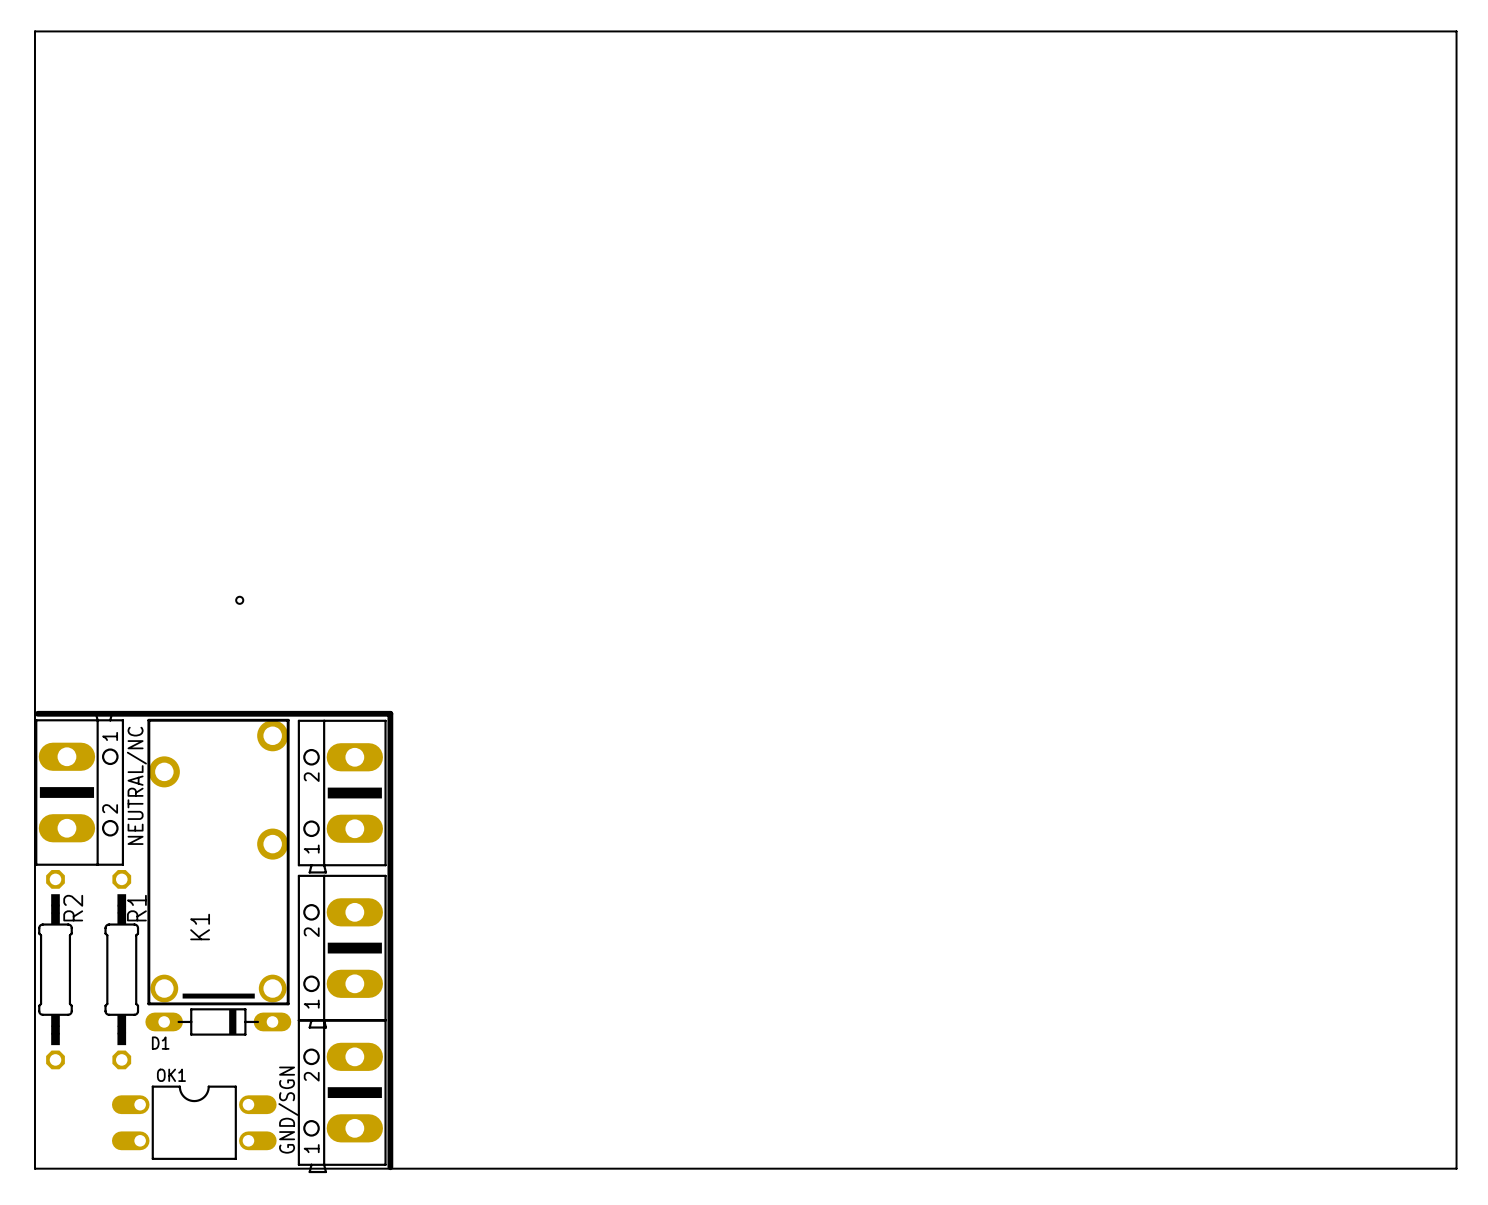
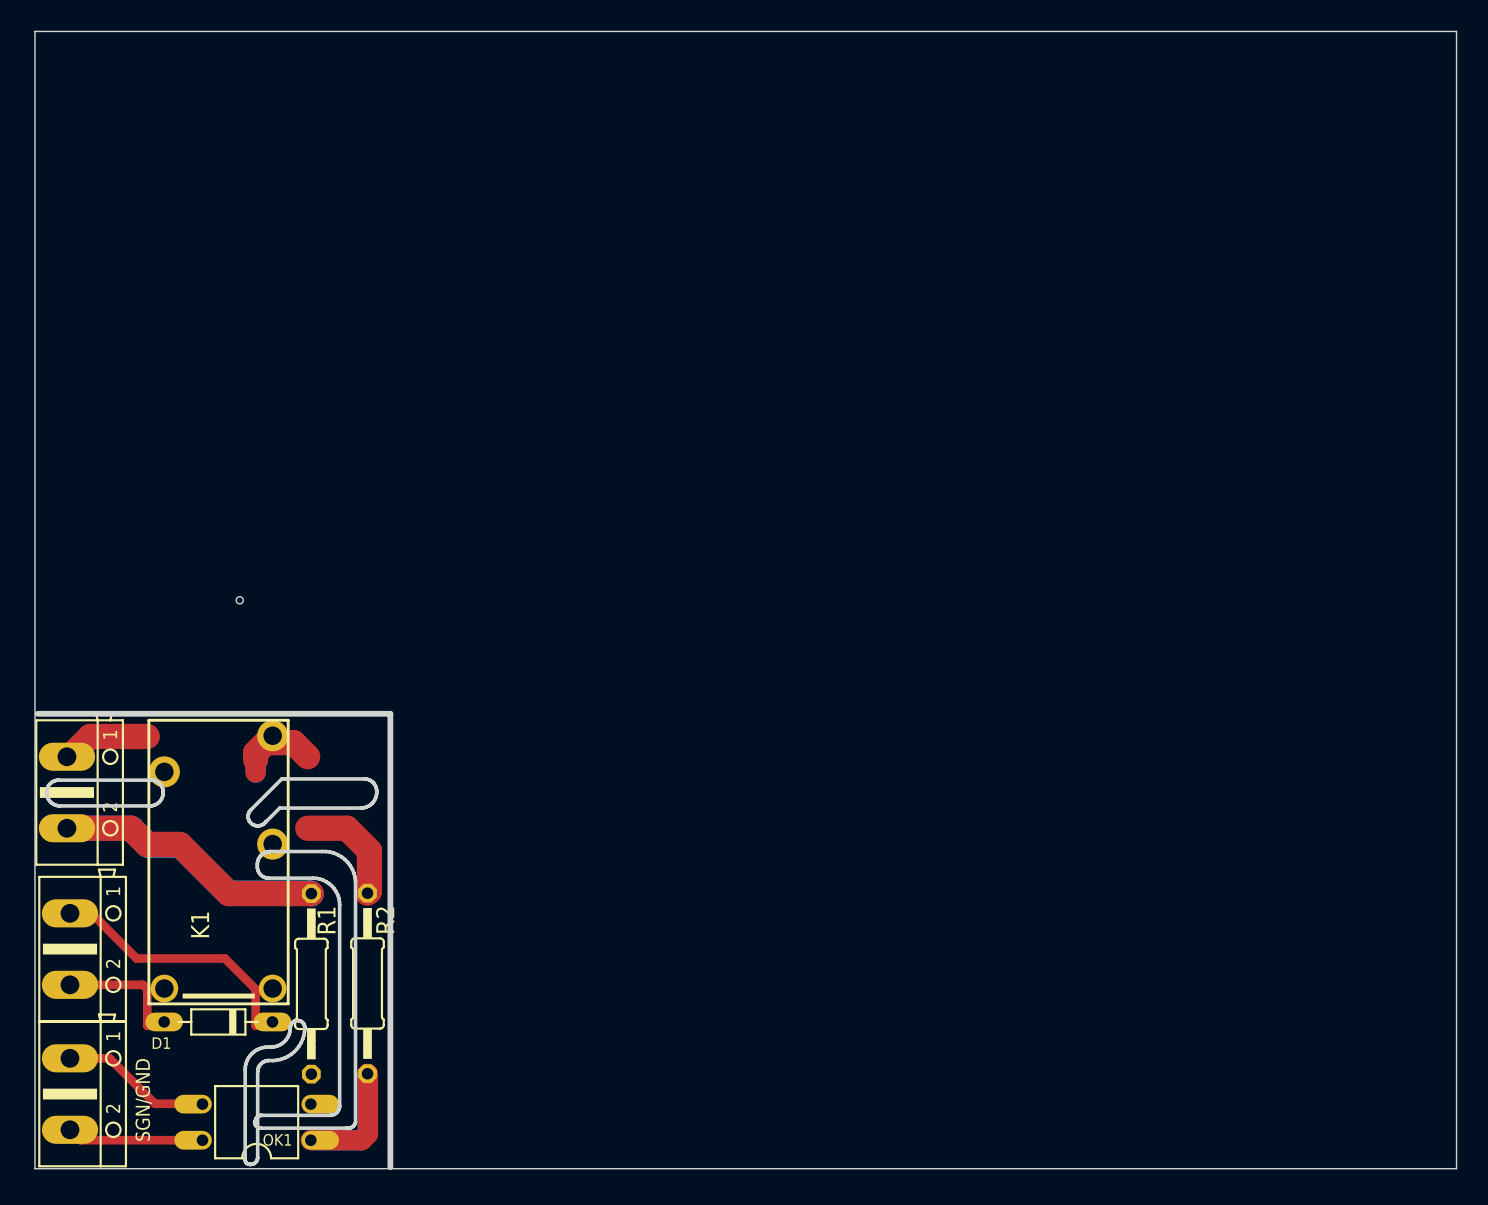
top track: none -> (147, 736) (90, 736) (69, 756)
top track: none -> (307, 756) (293, 742) (265, 742) (255, 752) (255, 772)
NEUTRAL/NC name: NEUTRAL/NC (136, 785) -> none
board edge: none -> (46, 792) (49, 784) (57, 780) (151, 780) (159, 783) (163, 792) (159, 802) (151, 805) (60, 805) (50, 801) (46, 792)
part: (342, 796) -> none
board edge: none -> (265, 821) (261, 825) (254, 825) (249, 820) (248, 813) (281, 778) (365, 779) (373, 782) (376, 788) (374, 800) (365, 807) (279, 808) (266, 821)
top track: none -> (69, 828) (130, 828) (147, 844) (179, 844) (228, 893) (311, 893)
top track: none -> (307, 828) (346, 828) (369, 850) (369, 891) (367, 893)
board edge: none -> (270, 851) (263, 853) (258, 859) (257, 869) (261, 875) (268, 878) (319, 879) (331, 885) (338, 897) (339, 1105) (337, 1111) (332, 1115) (260, 1115) (256, 1117) (254, 1123) (260, 1128) (349, 1128) (355, 1122) (355, 881) (353, 873) (344, 859) (330, 852) (270, 851)
top track: none -> (69, 913) (91, 913) (136, 958) (224, 958) (255, 989) (255, 1025)
part: none -> (82, 945)
part: (342, 951) -> none
R2 position: (55, 969) -> (367, 983)
R1 position: (121, 969) -> (311, 983)
top track: none -> (69, 984) (142, 984) (147, 989) (147, 1025)
top track: none -> (69, 1058) (109, 1058) (154, 1103) (202, 1104)
top track: none -> (367, 1073) (367, 1134) (361, 1140) (310, 1140)
OK1 name position: OK1 (171, 1075) -> OK1 (277, 1139)
part: none -> (82, 1090)
part: (342, 1096) -> none
text: none -> SGN/GND (143, 1099)
text: GND/SGN (288, 1110) -> none
OK1 rotation: 0° (194, 1122) -> 180° (256, 1122)
top track: none -> (78, 1138) (69, 1129) (80, 1140) (202, 1140)
board edge: none -> (245, 1158) (246, 1163) (250, 1164) (254, 1163) (257, 1158) (258, 1067) (264, 1061) (284, 1058) (296, 1049) (304, 1031) (304, 1025) (300, 1020) (292, 1022) (288, 1035) (282, 1043) (256, 1050) (246, 1061) (245, 1069) (245, 1158)

